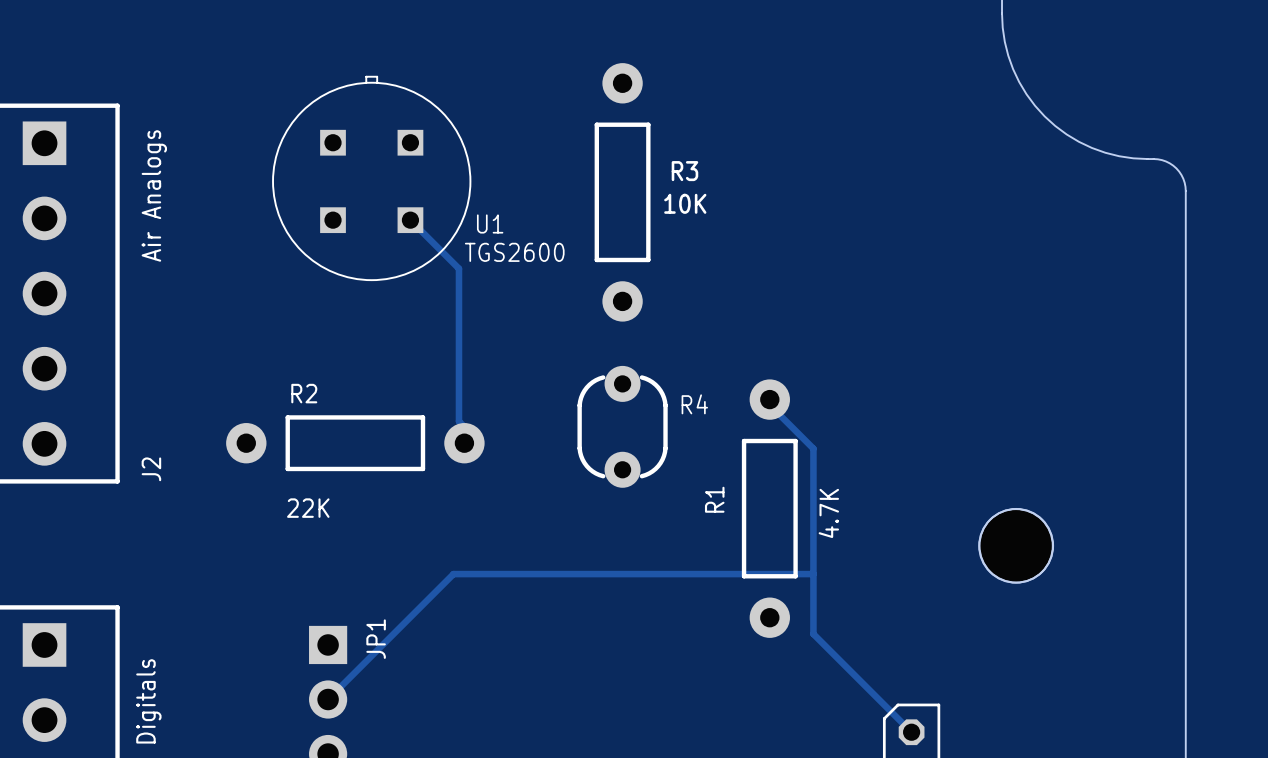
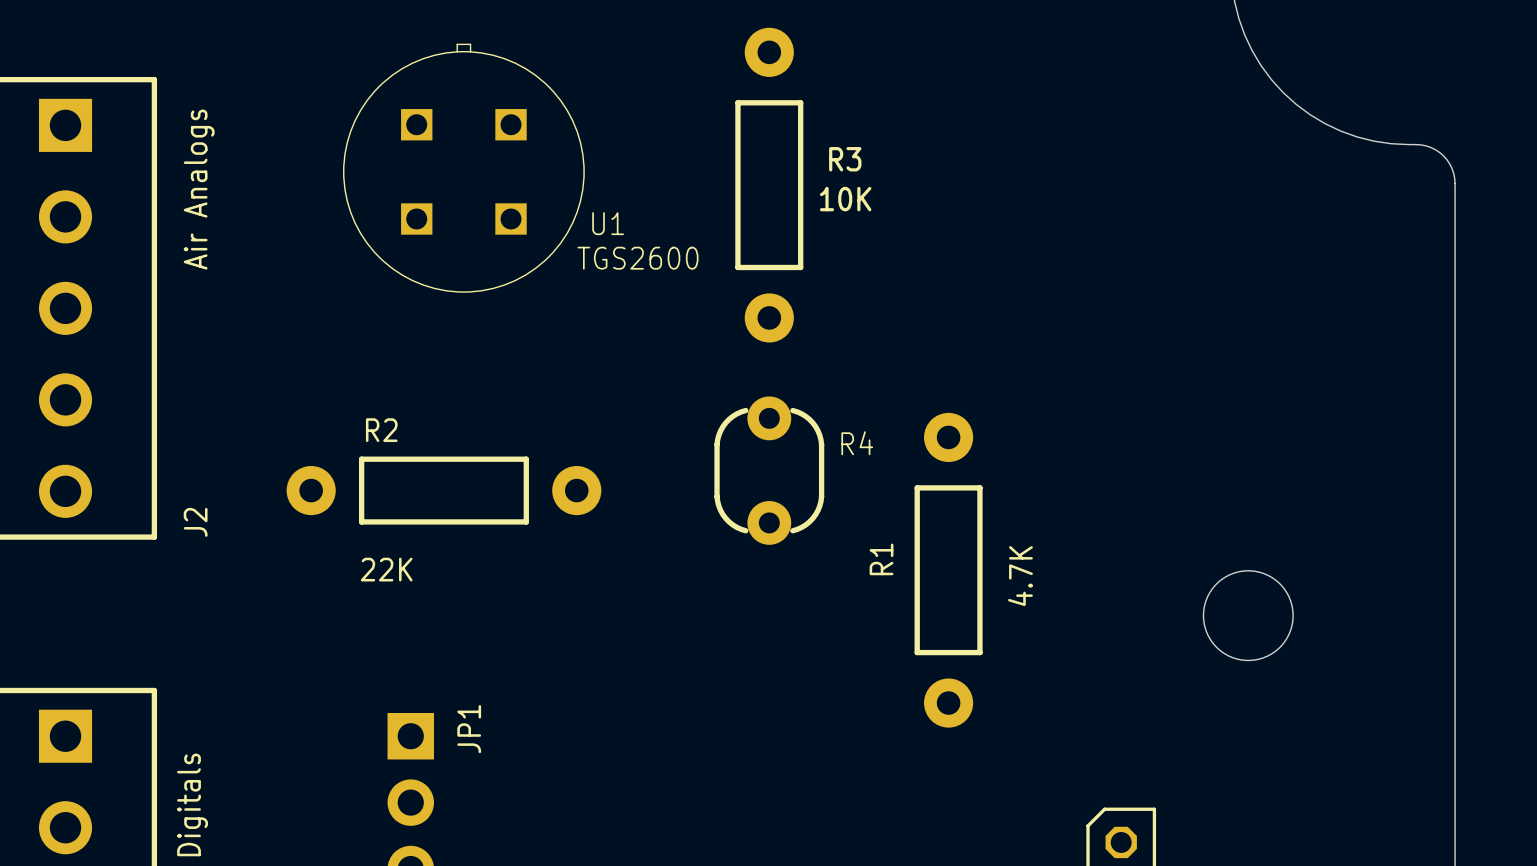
track: (410, 220) (458, 268) (458, 421) (464, 426) (464, 443) -> none
track: (769, 399) (769, 405) (813, 448) (813, 634) (911, 732) -> none
hole: (1016, 545) -> none
track: (813, 574) (453, 574) (328, 699) -> none

